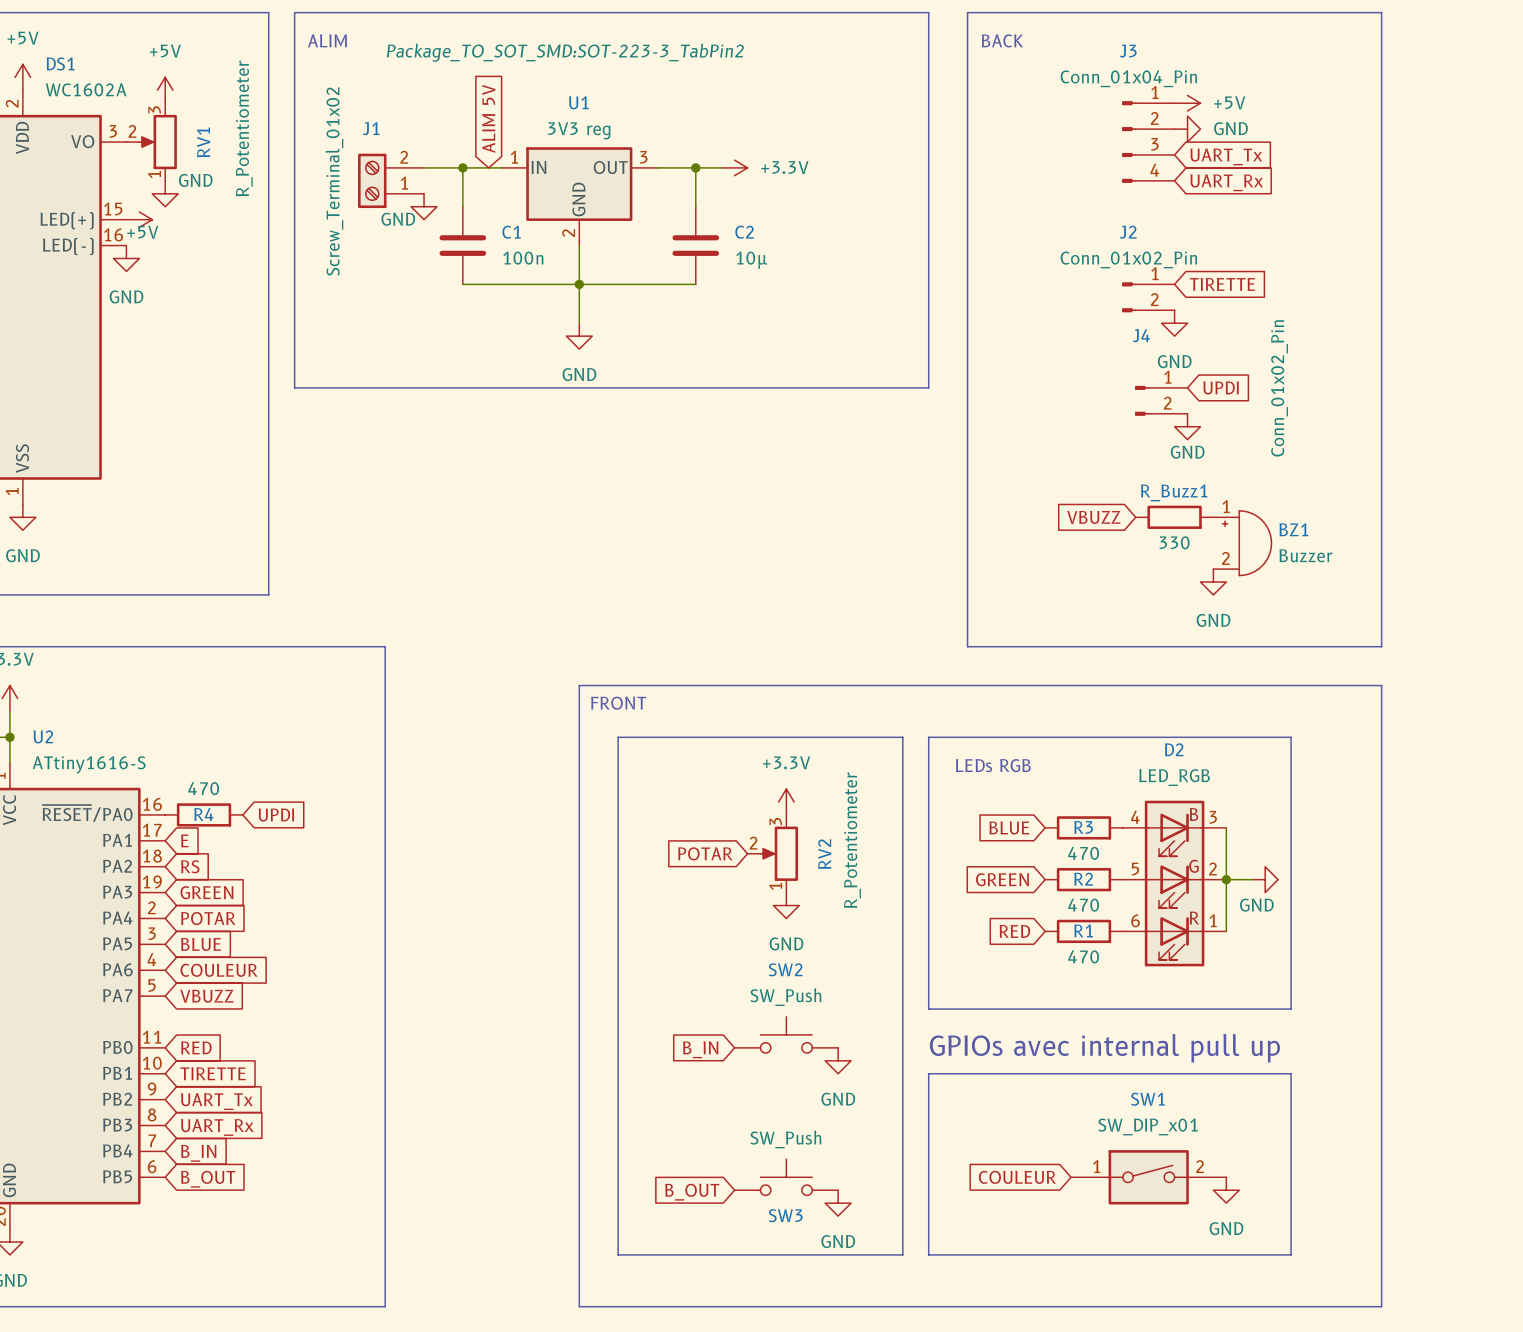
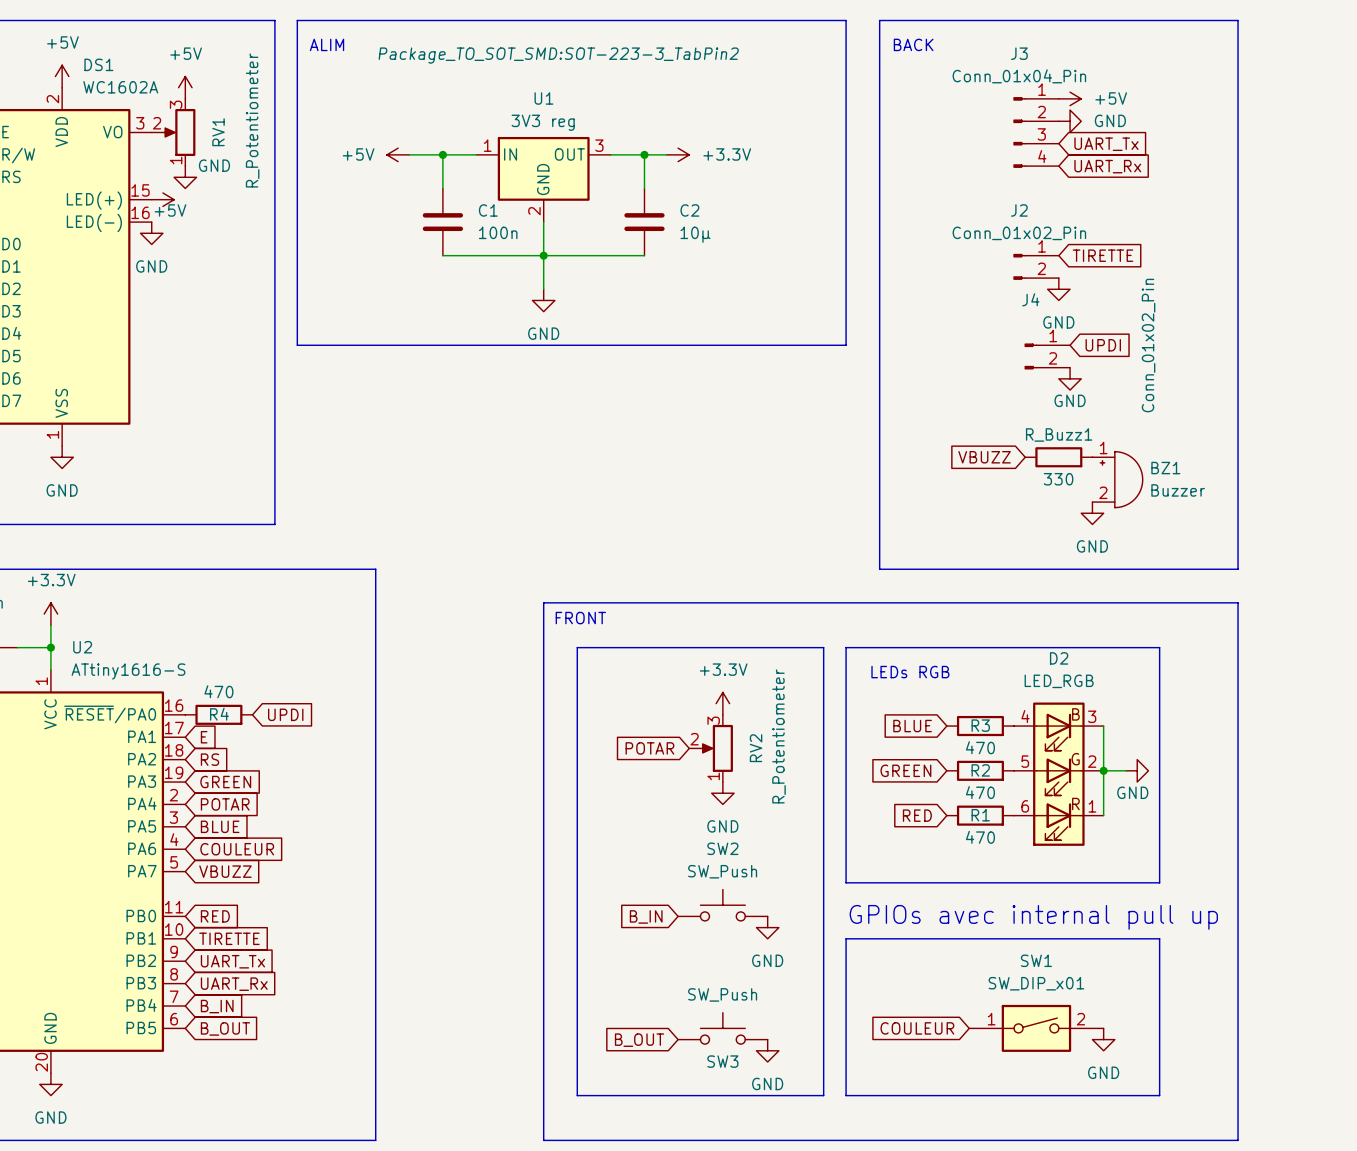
global label: ALIM 5V (488, 118) -> none
power symbol: none -> +5V (398, 154)
J1: Screw_Terminal_01x02 (391, 180) -> none
power symbol: GND (424, 206) -> none

